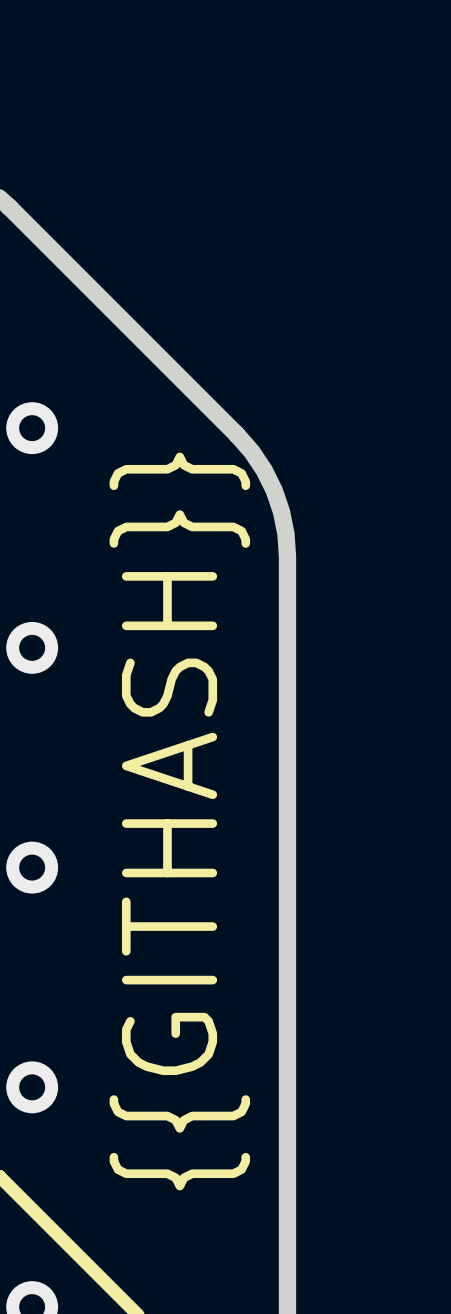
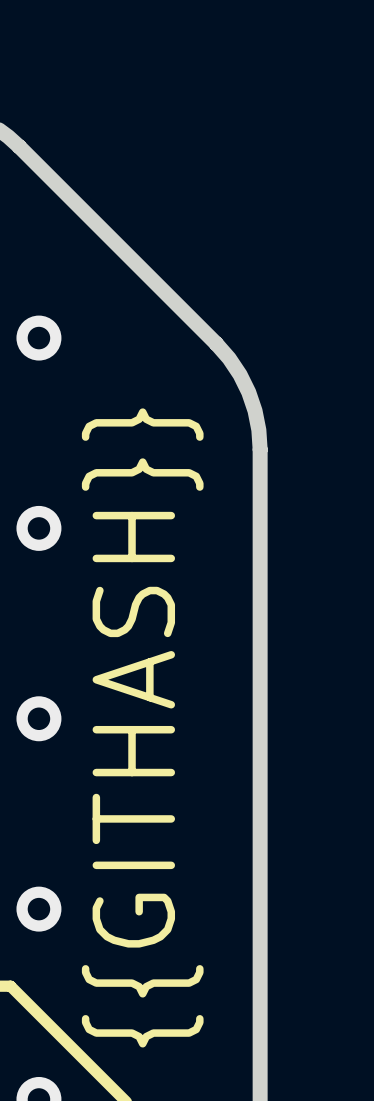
text position: {{GITHASH}} (179, 821) -> {{GITHASH}} (142, 727)

